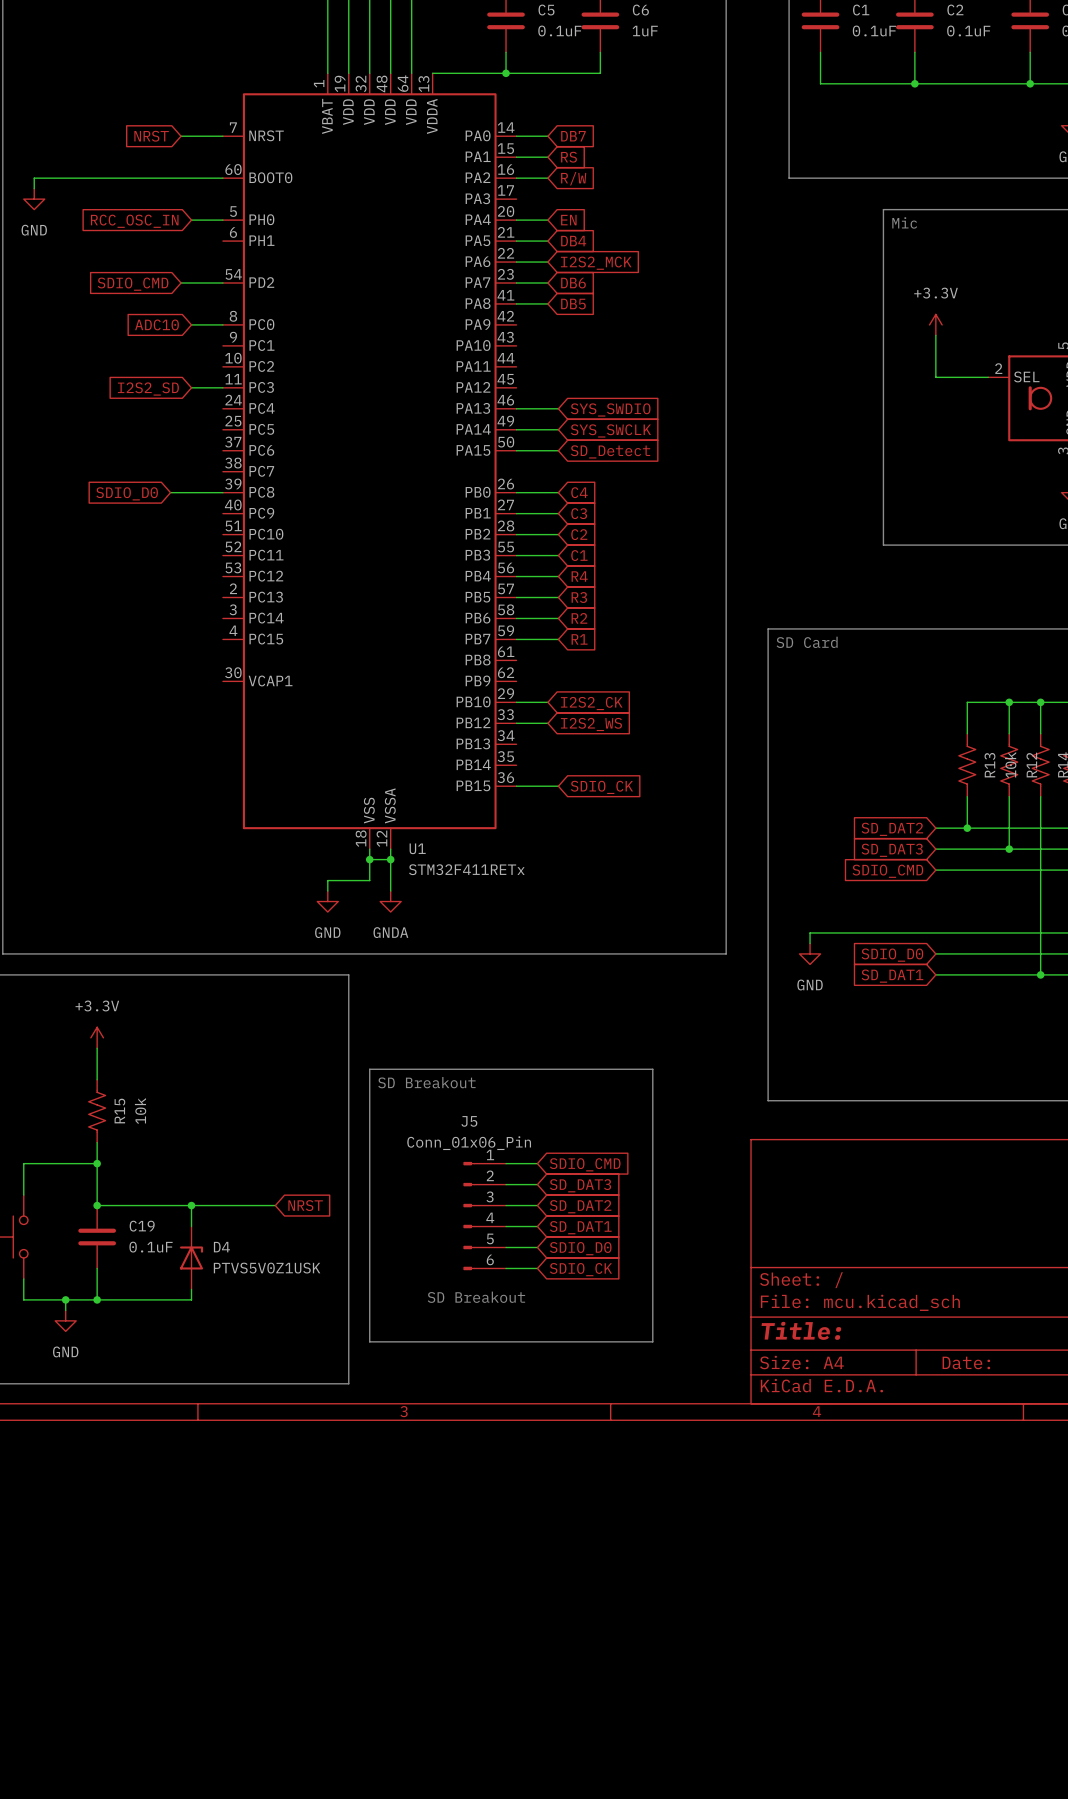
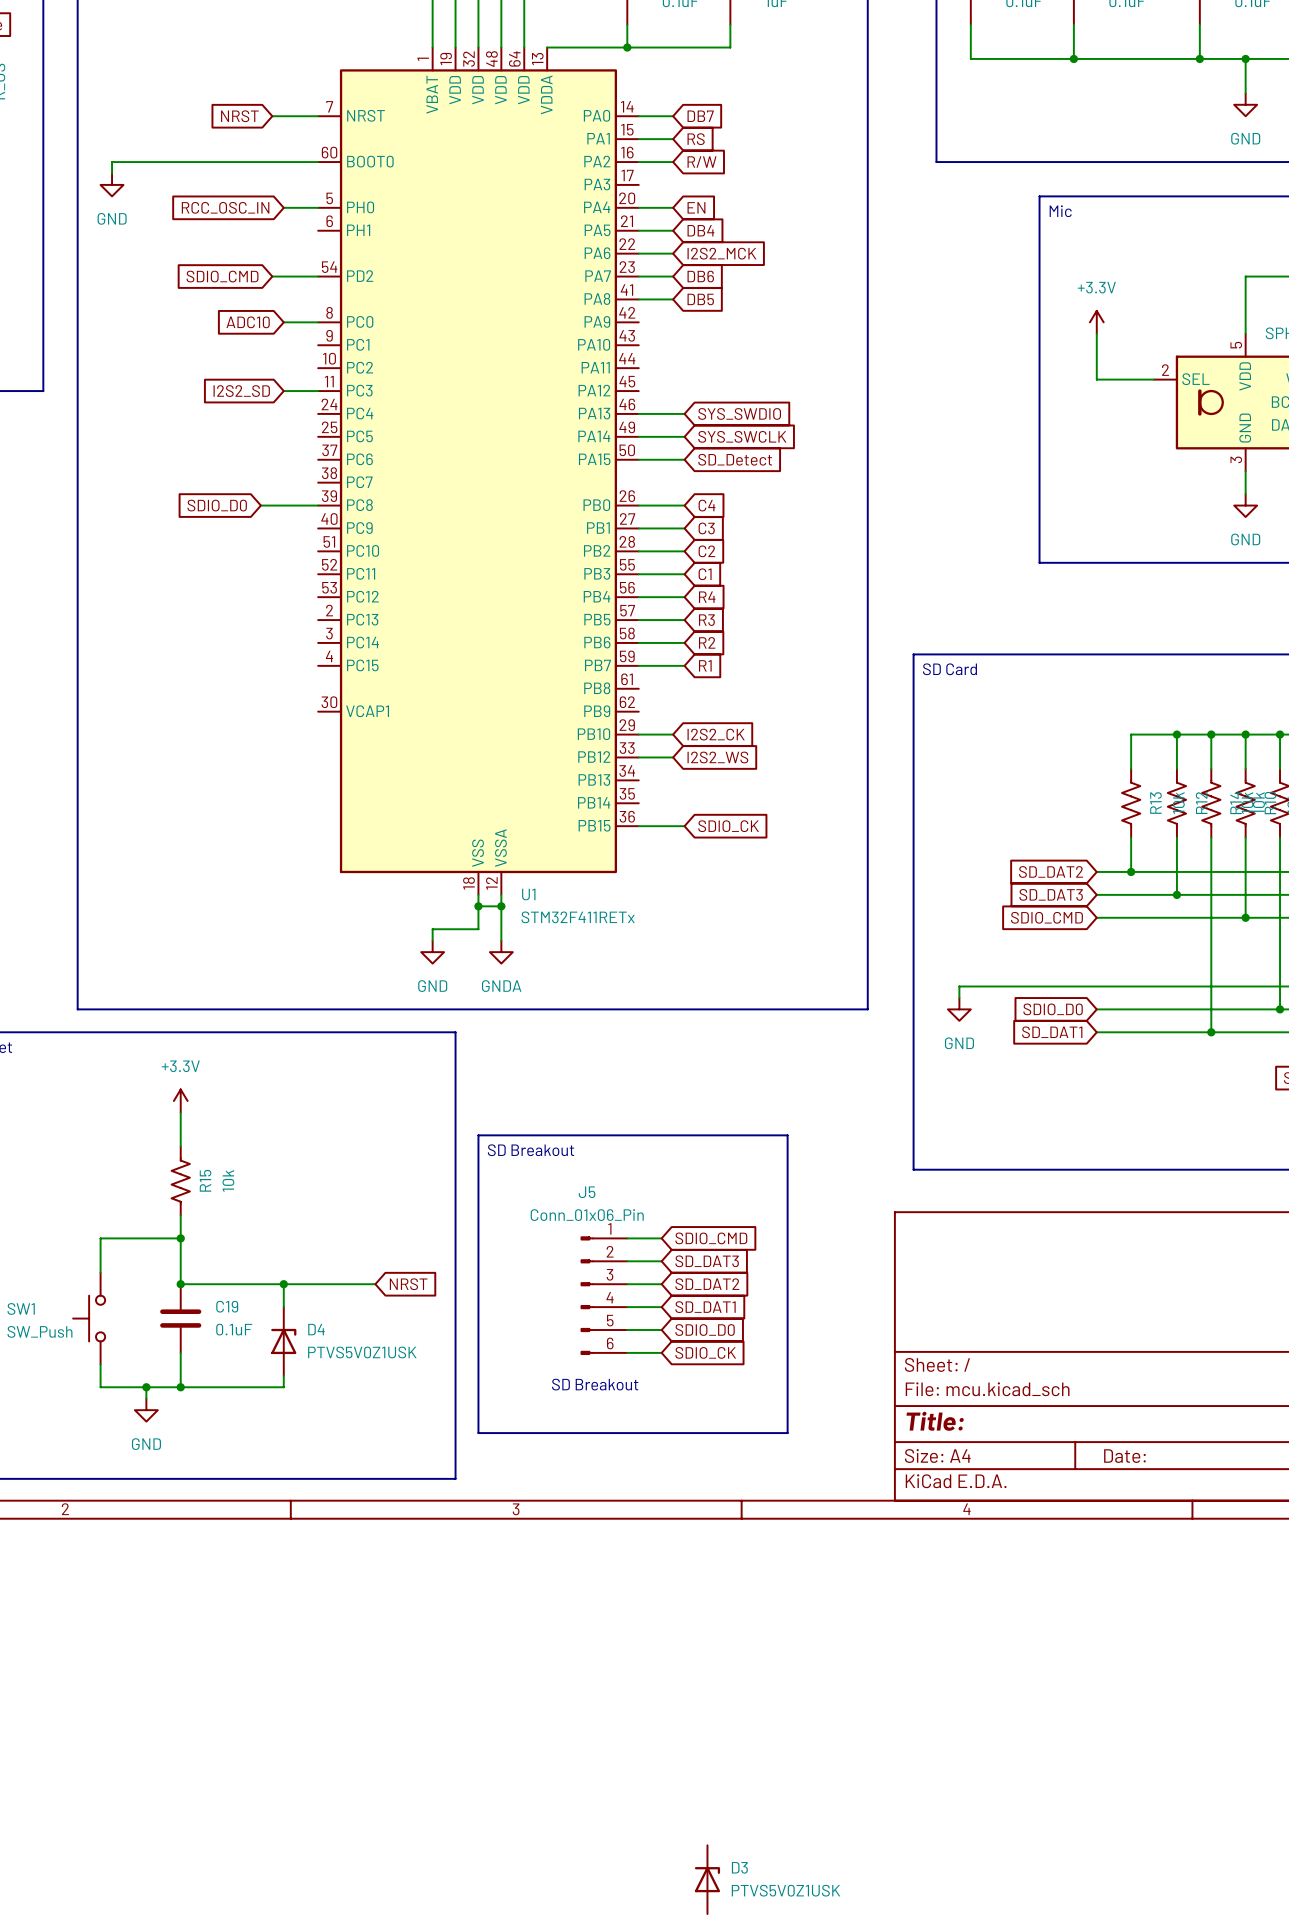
D3: none -> PTVS5V0Z1USK (707, 1879)

